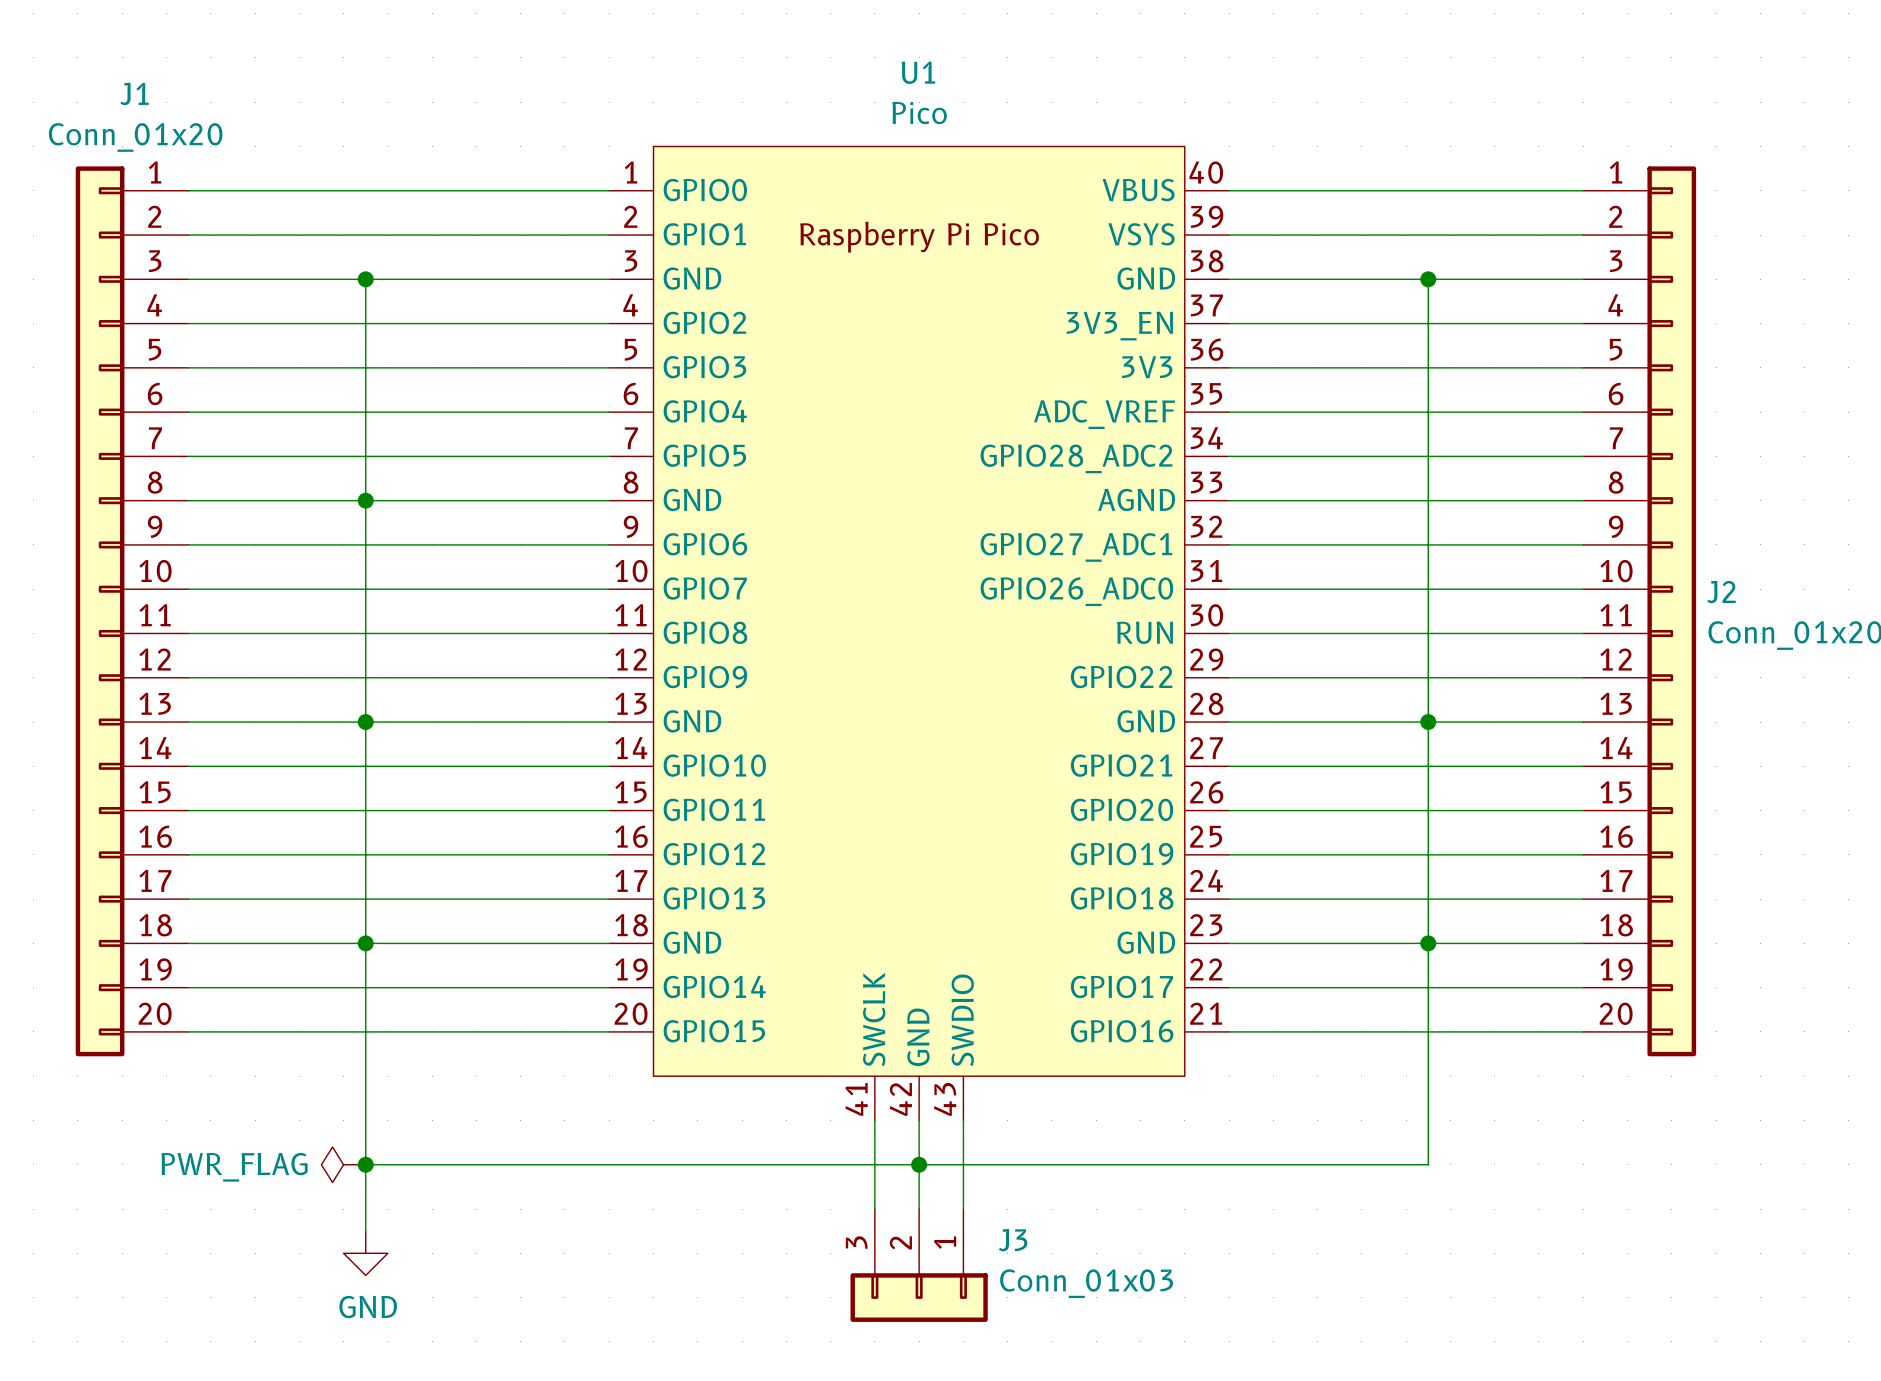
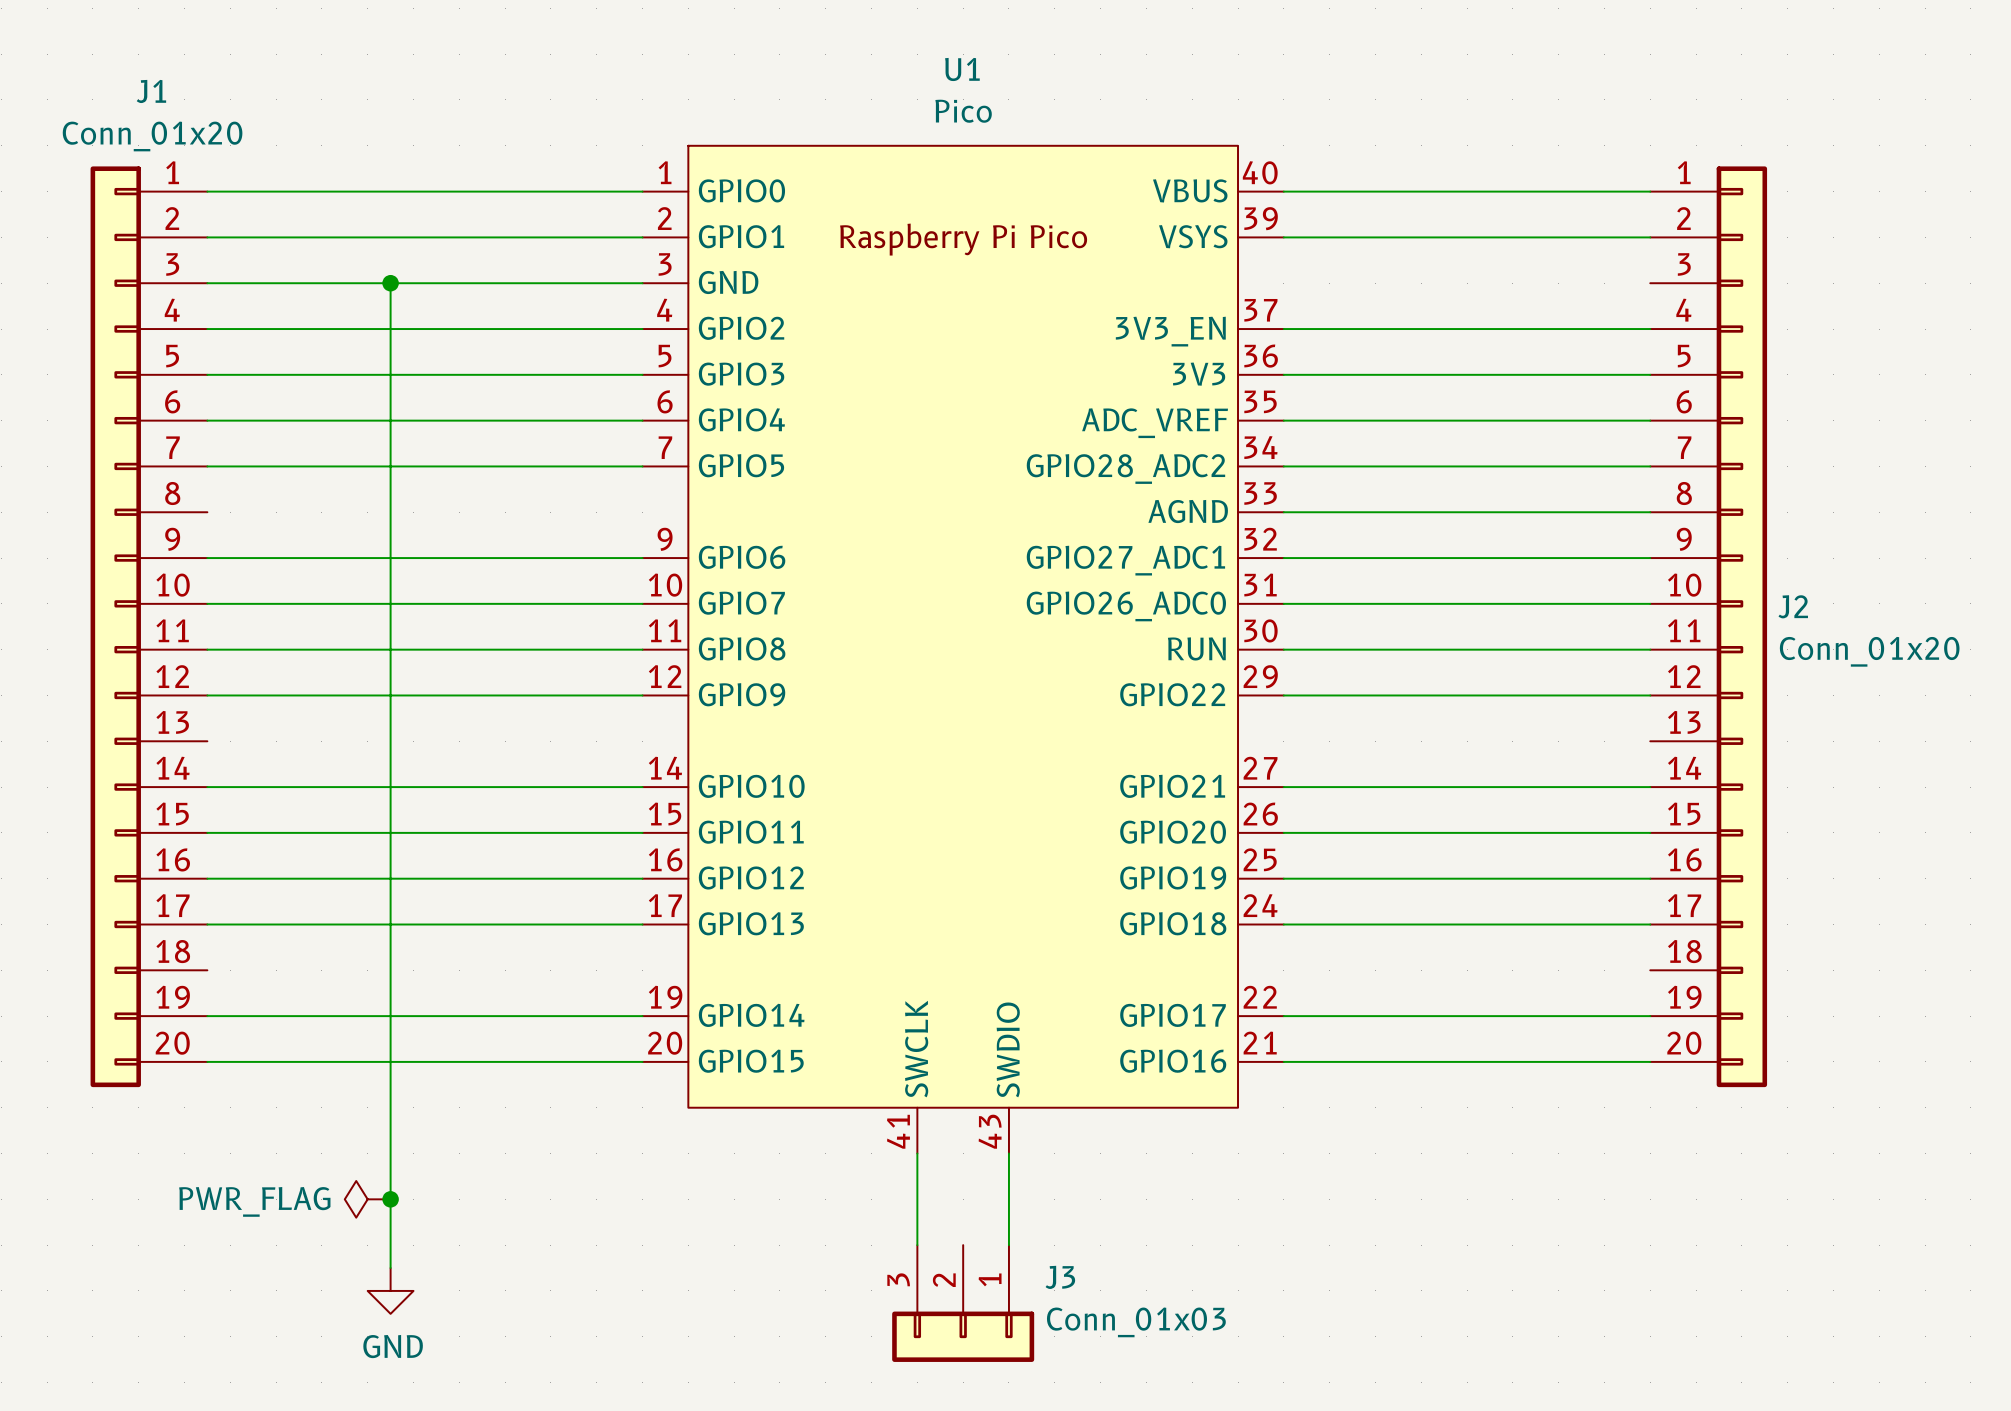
U1 symbol: [609, 146, 1230, 1121] -> [642, 145, 1284, 1154]
wire: (1229, 279) (1583, 279) -> none
wire: (1428, 279) (1428, 1164) (365, 1164) -> none
junction: (1428, 279) -> none
wire: (188, 500) (609, 500) -> none
junction: (365, 500) -> none
wire: (188, 722) (609, 722) -> none
junction: (365, 722) -> none
wire: (1229, 722) (1583, 722) -> none
junction: (1428, 722) -> none
wire: (188, 943) (609, 943) -> none
junction: (365, 943) -> none
wire: (1229, 943) (1583, 943) -> none
junction: (1428, 943) -> none
wire: (919, 1120) (919, 1209) -> none
junction: (919, 1164) -> none

